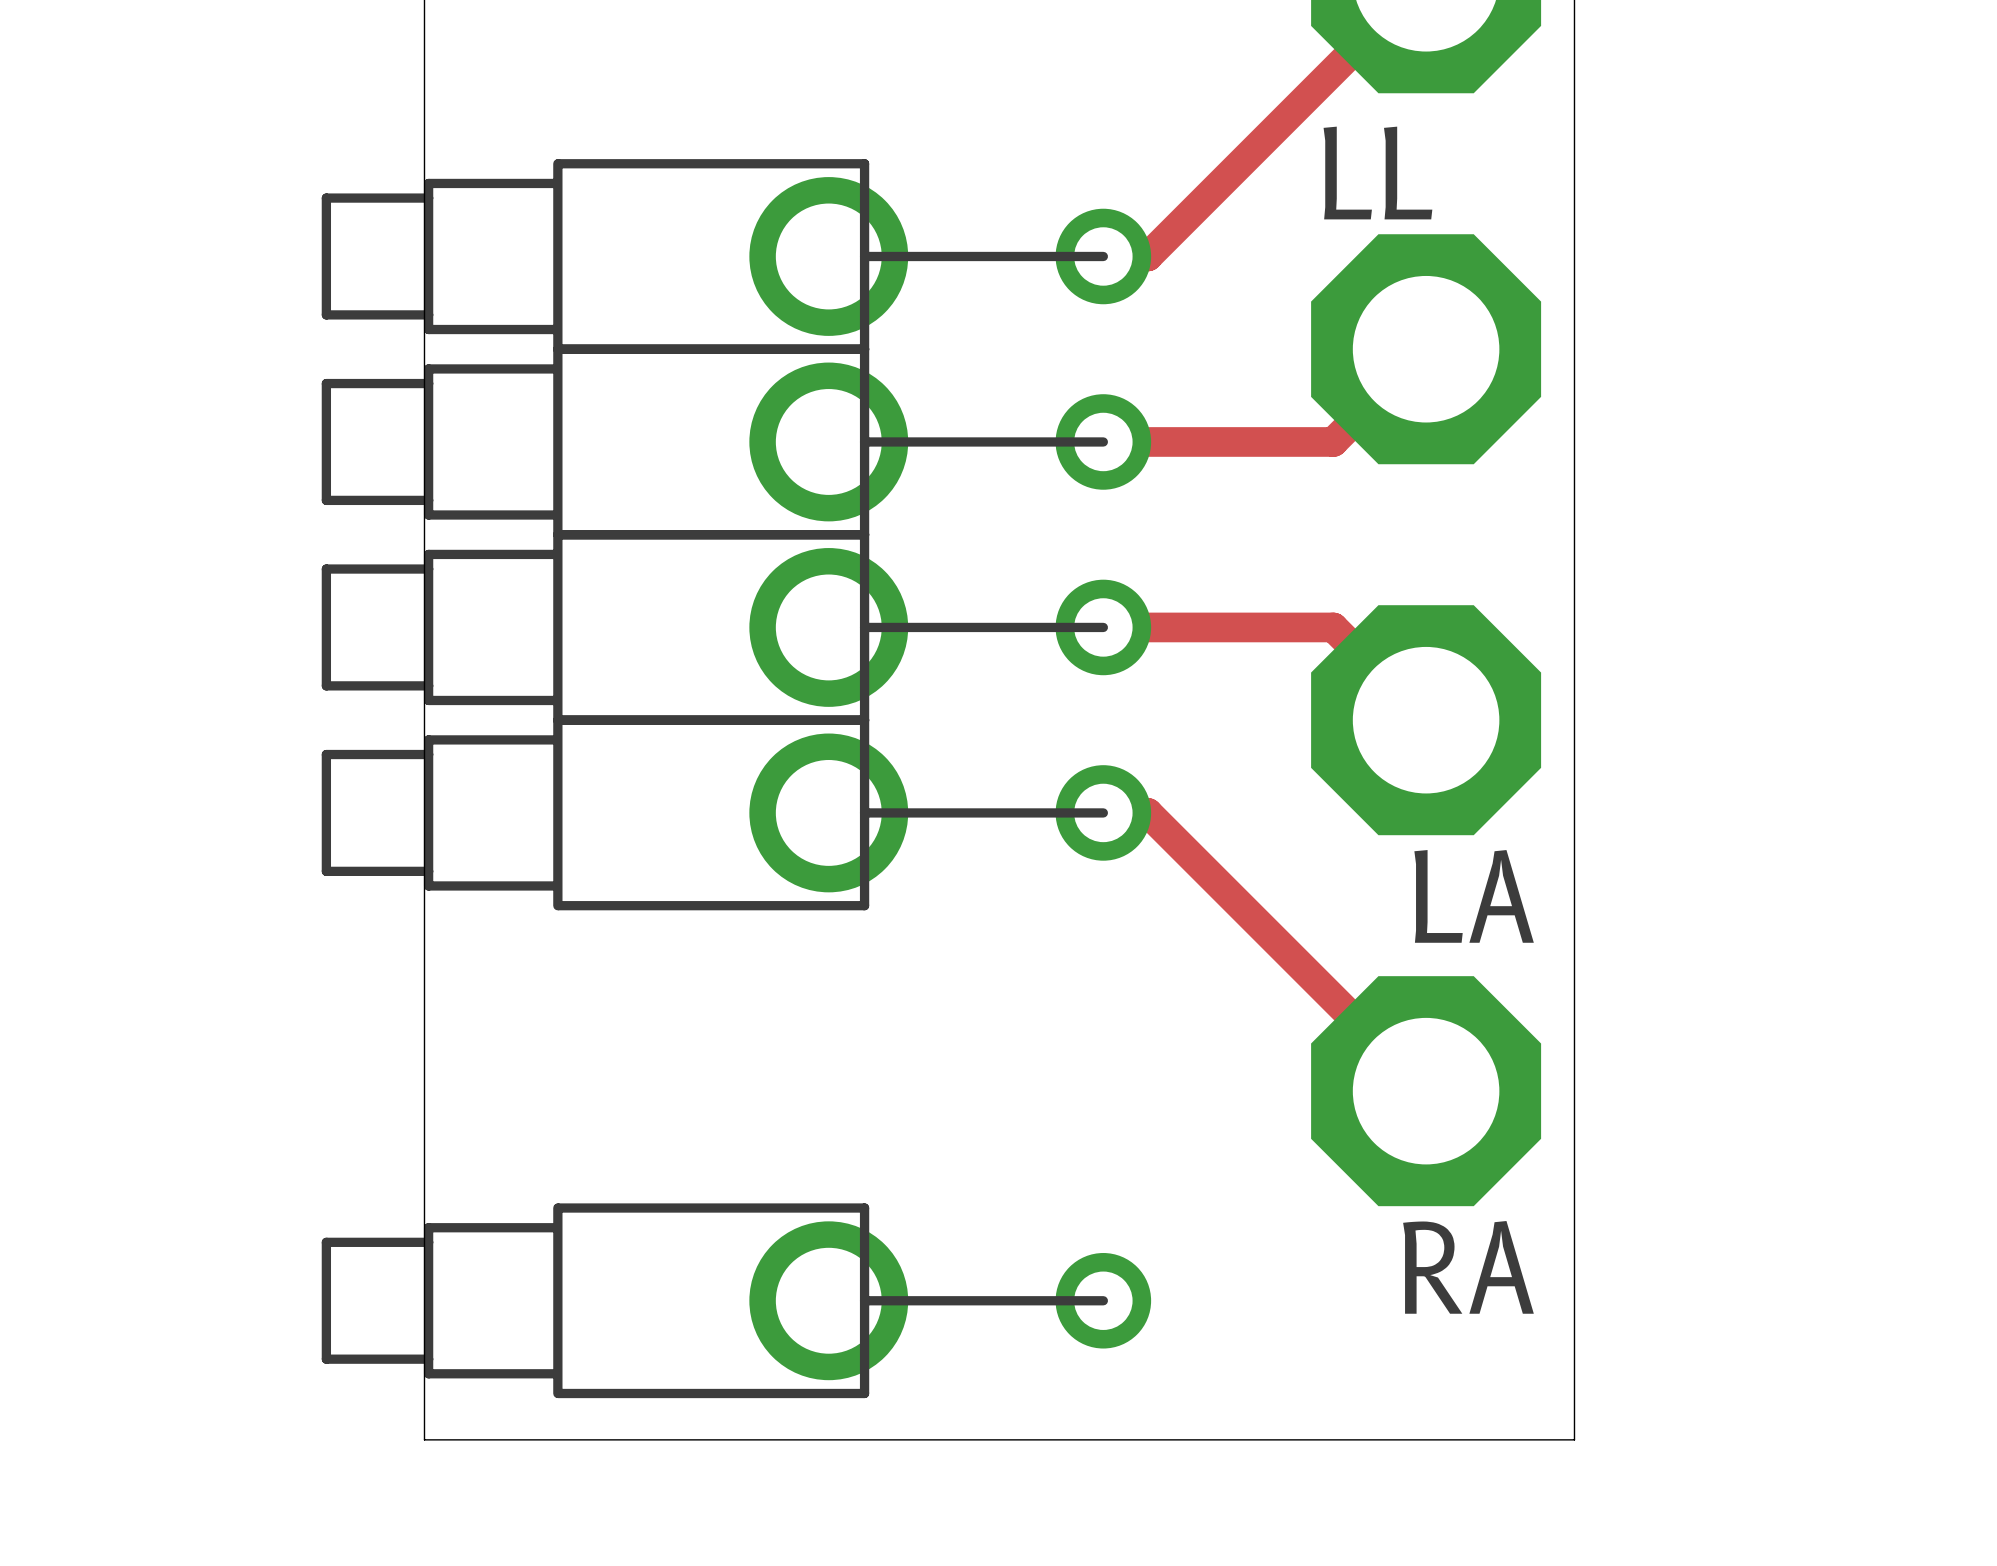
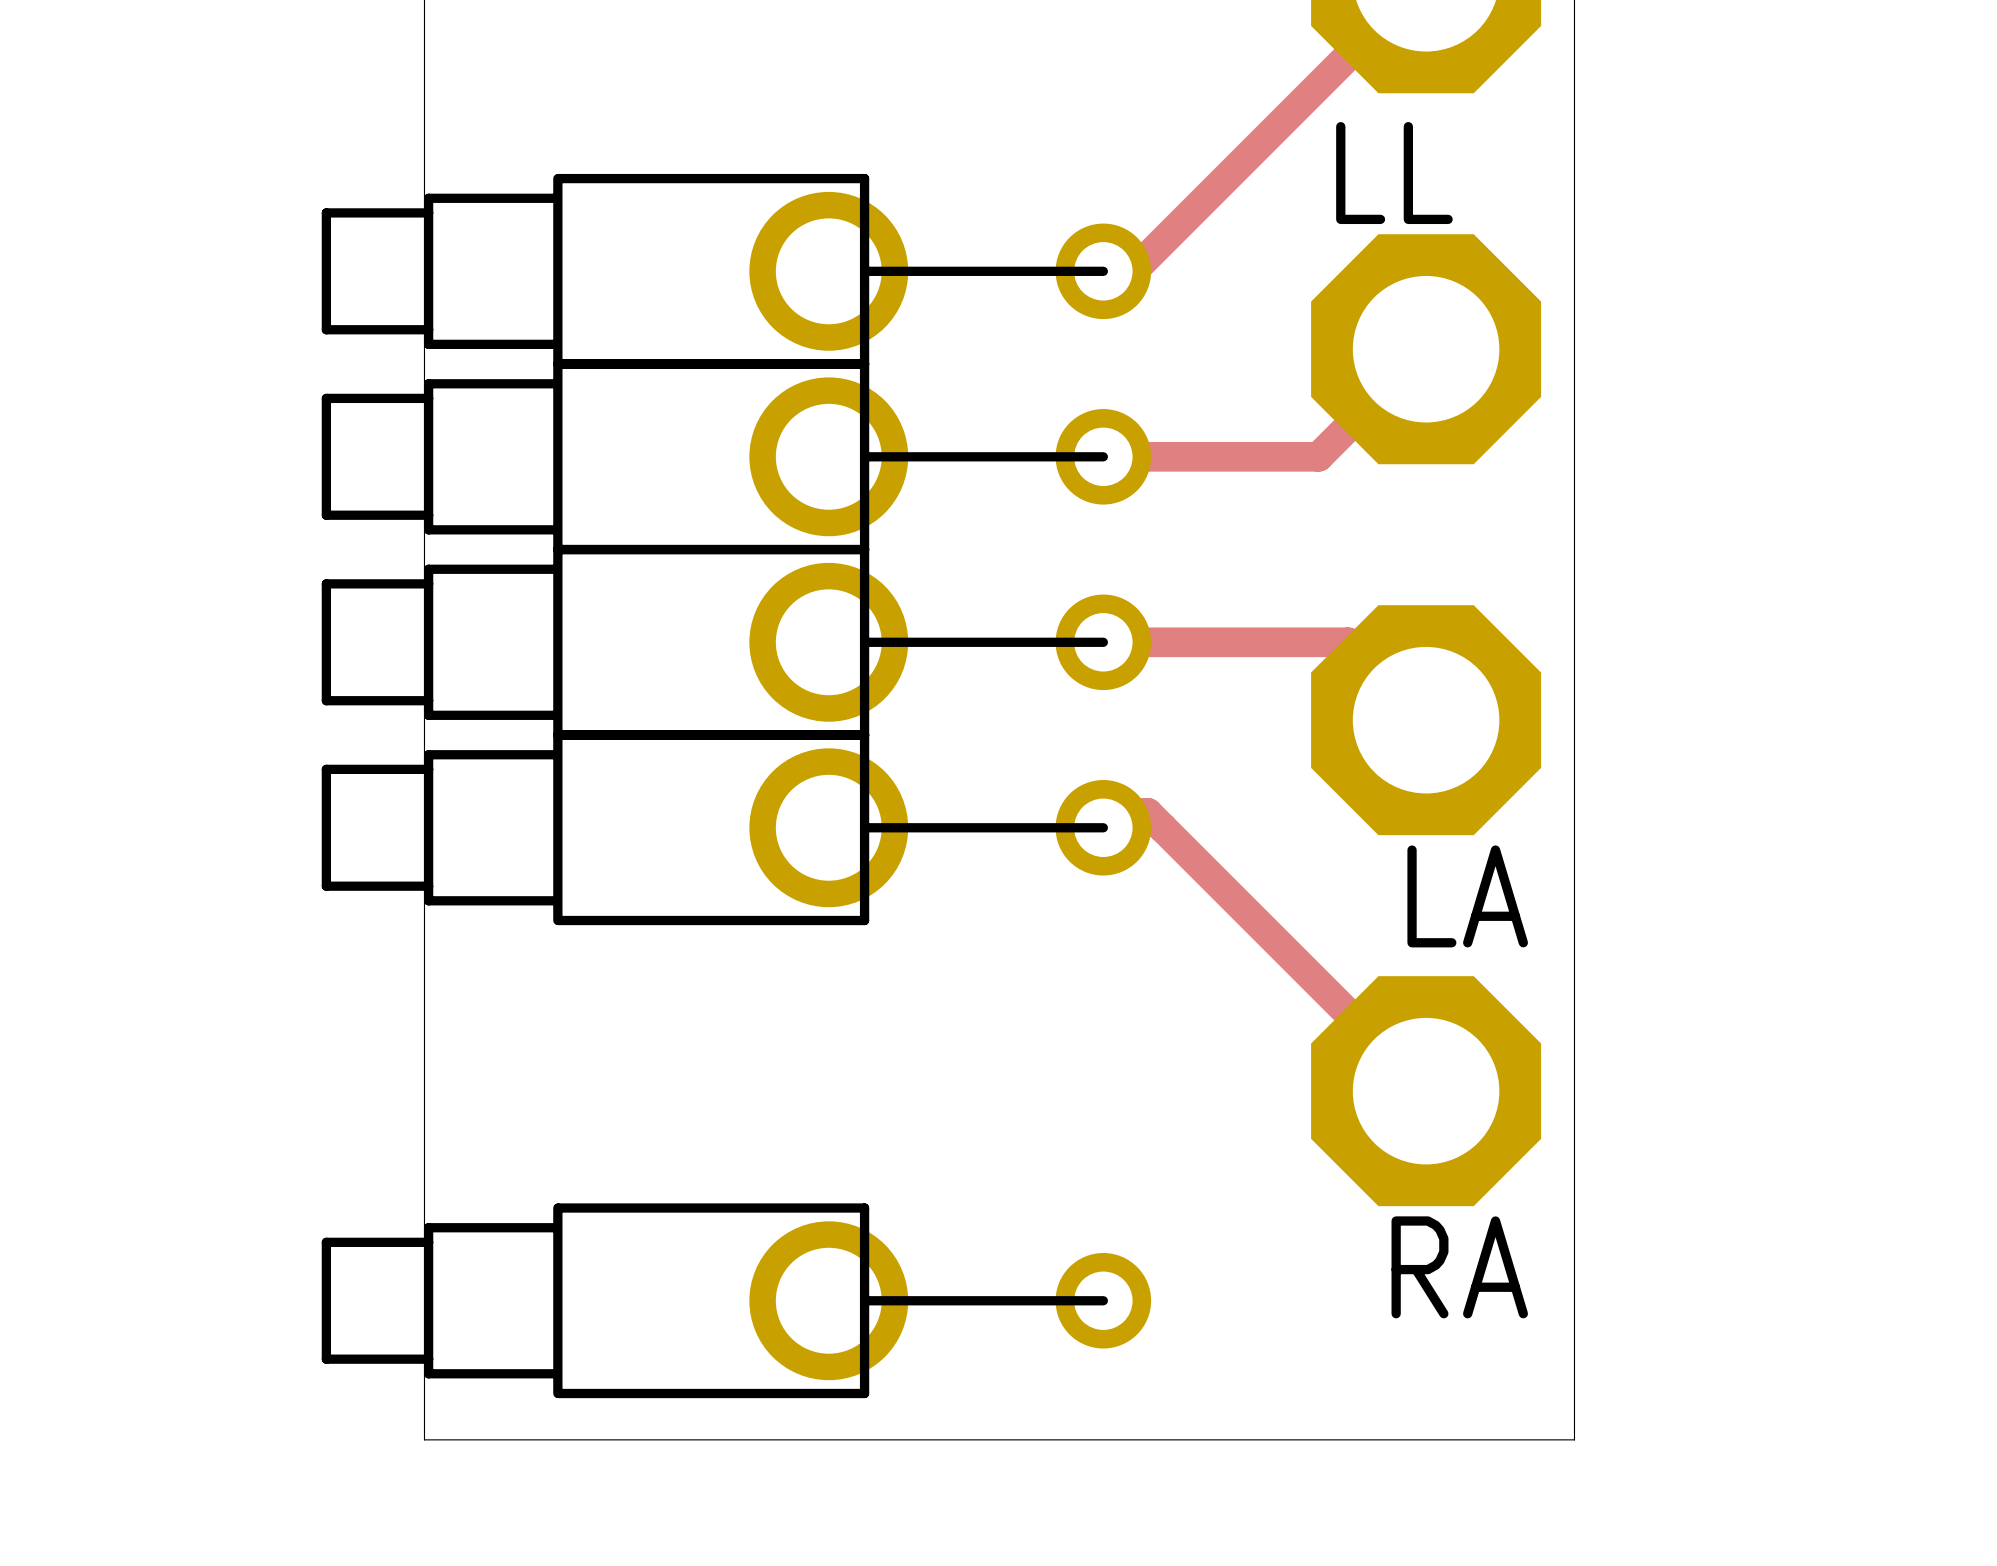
part position: (736, 256) -> (736, 271)
part position: (736, 441) -> (736, 456)
track: (1103, 441) (1333, 441) -> (1103, 456) (1318, 456) (1333, 441)
part position: (736, 627) -> (736, 642)
track: (1103, 627) (1333, 627) (1348, 642) -> (1103, 642) (1348, 642)
part position: (736, 812) -> (736, 827)

